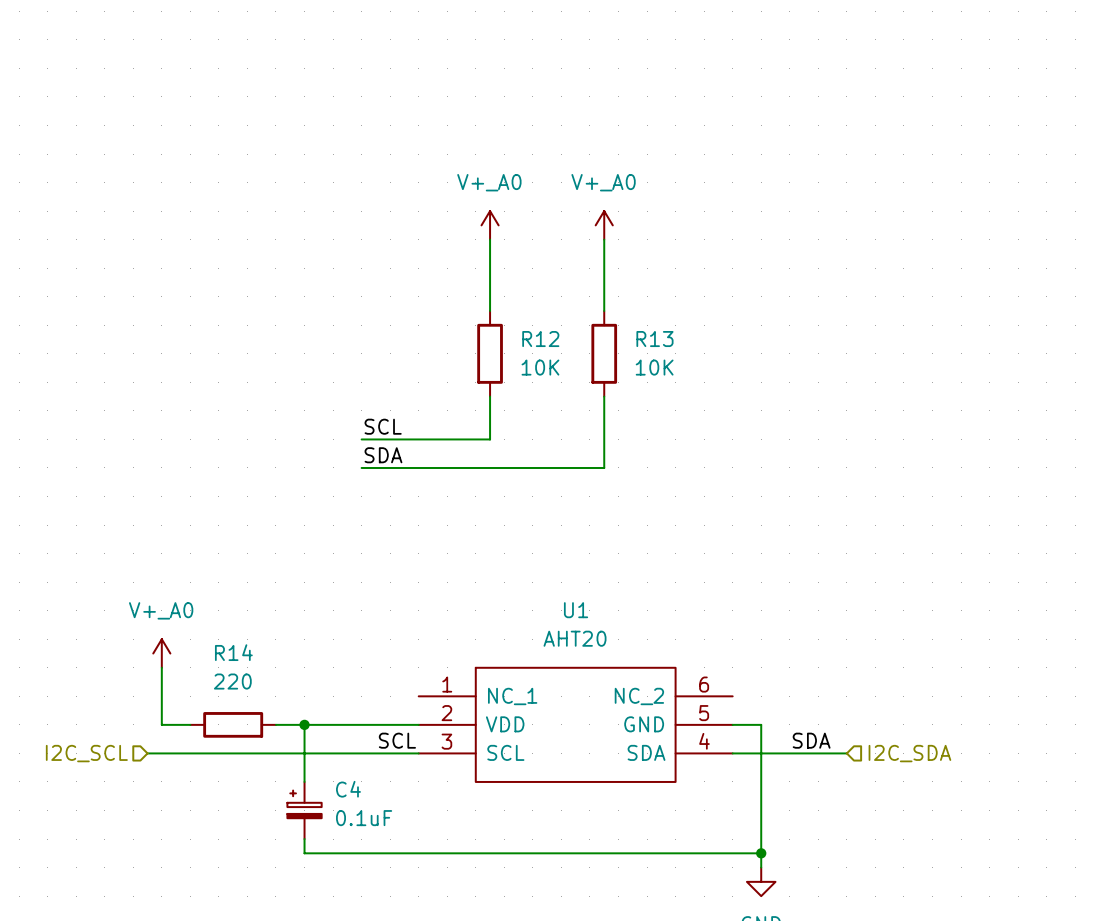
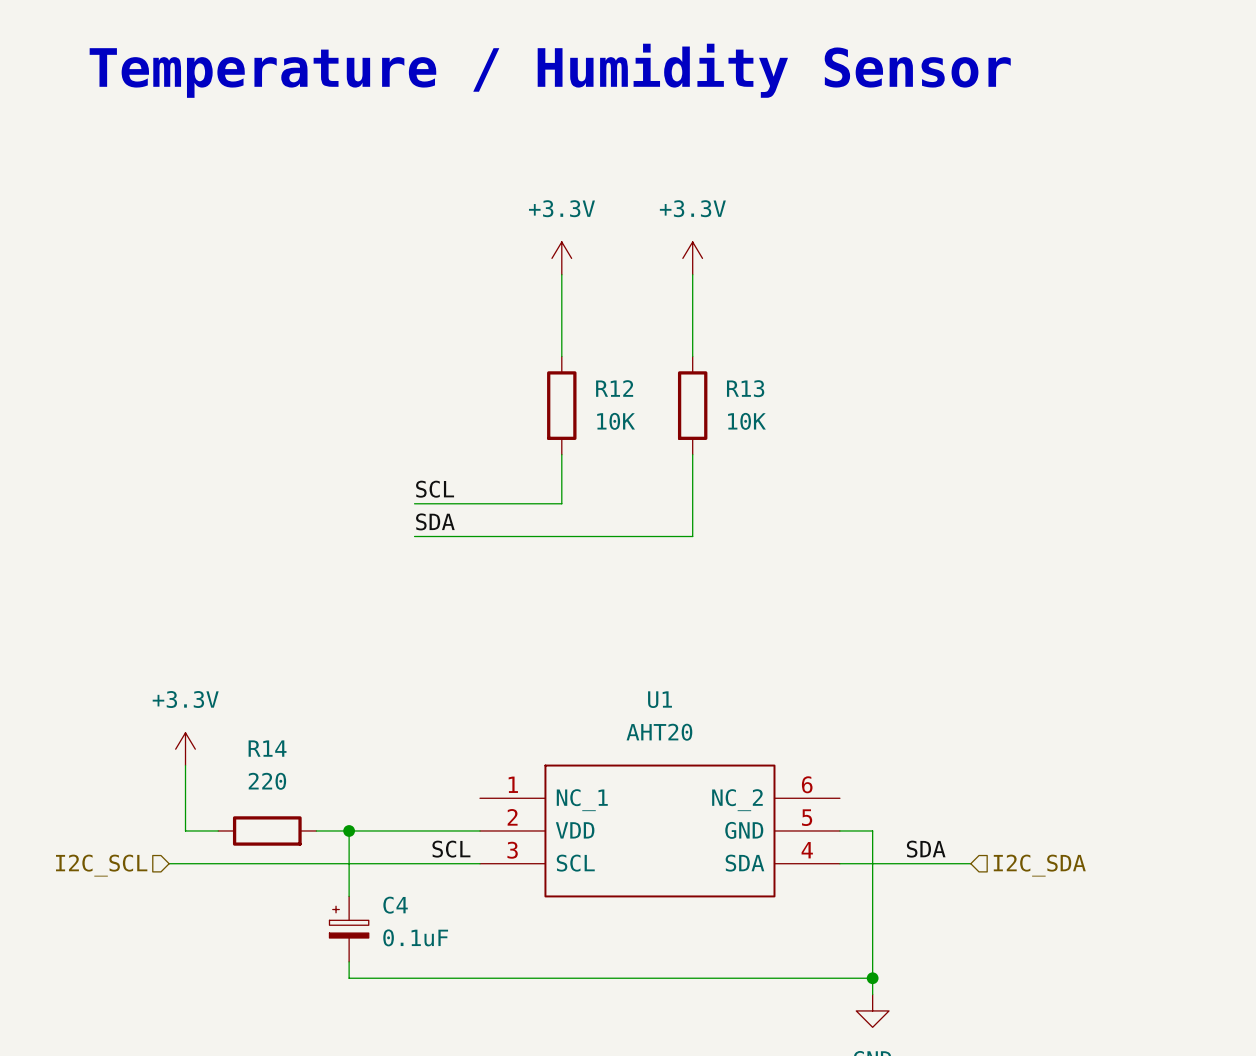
text: none -> Temperature / Humidity Sensor (550, 70)
power symbol: V+_A0 (490, 225) -> +3.3V (561, 258)
power symbol: V+_A0 (604, 225) -> +3.3V (692, 258)
power symbol: V+_A0 (161, 653) -> +3.3V (185, 749)

